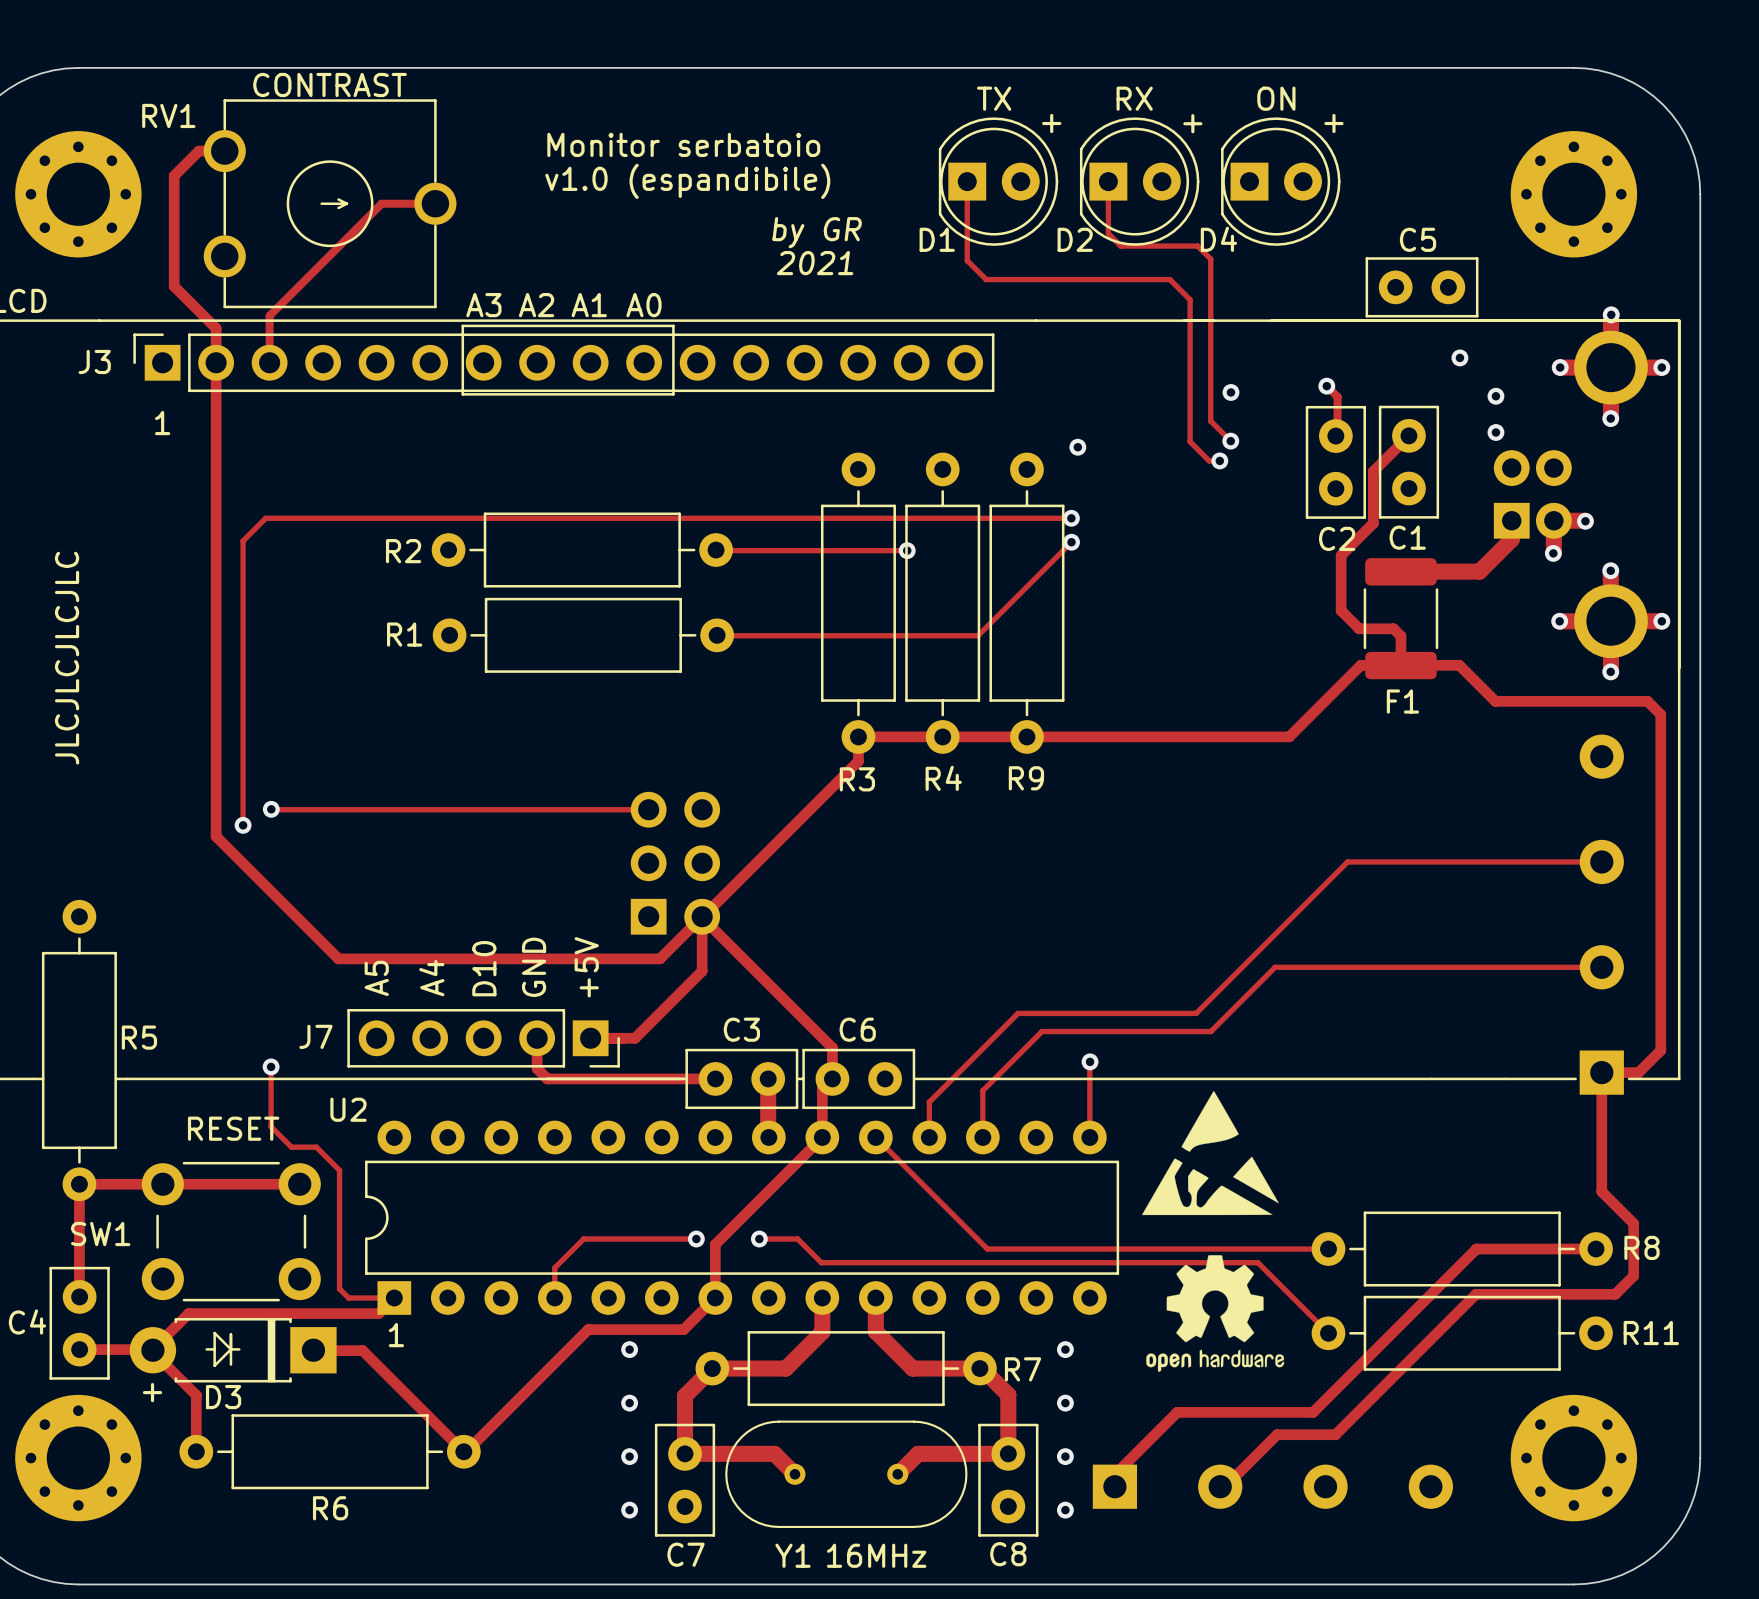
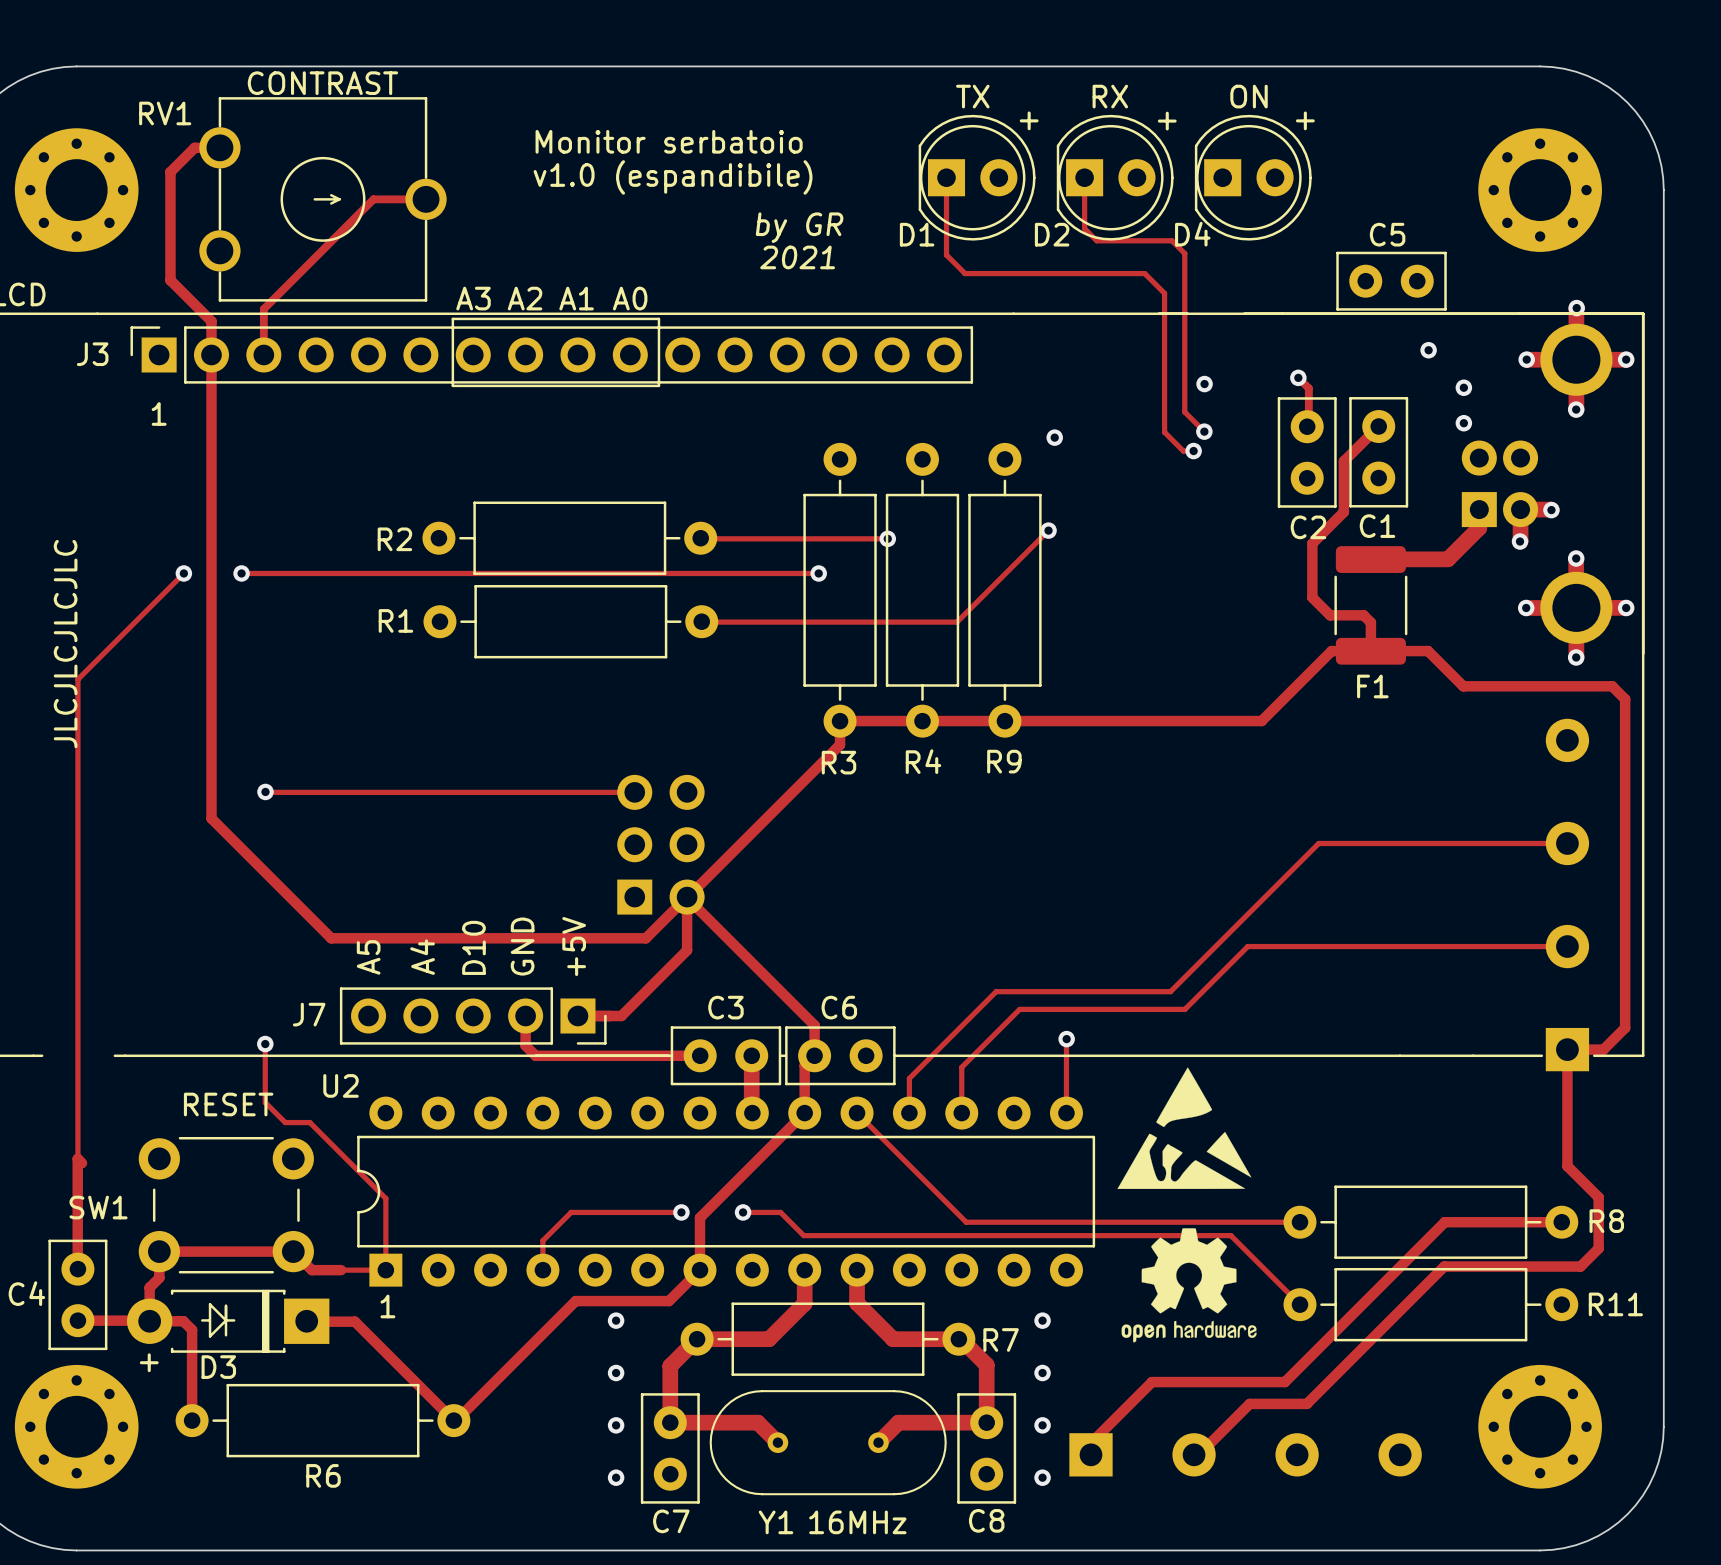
track: (1071, 518) (265, 518) (243, 540) (243, 825) -> none
via: (1071, 518) -> none
track: none -> (183, 573) (77, 679) (77, 1268)
via: none -> (183, 573)
track: none -> (241, 573) (818, 573)
via: none -> (241, 573)
via: none -> (818, 573)
via: (243, 825) -> none
R5: (79, 1050) -> none
track: (316, 1147) (339, 1170) (339, 1288) (348, 1297) -> (309, 1122) (385, 1198) (385, 1270)
track: (79, 1184) (300, 1184) -> none
track: (394, 1297) (378, 1313) (188, 1313) (151, 1350) (196, 1395) -> (341, 1270) (311, 1270) (293, 1251) (159, 1251) (159, 1277) (149, 1287) (149, 1321) (183, 1321) (192, 1329) (192, 1365)

